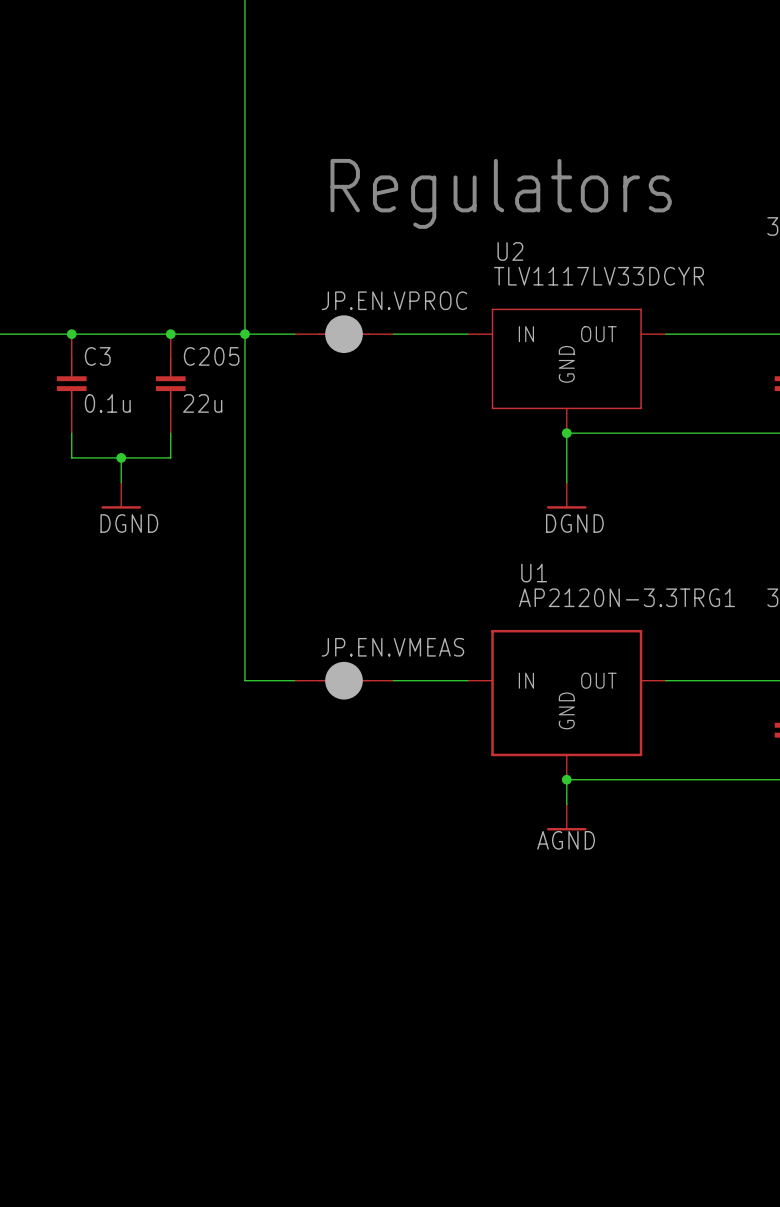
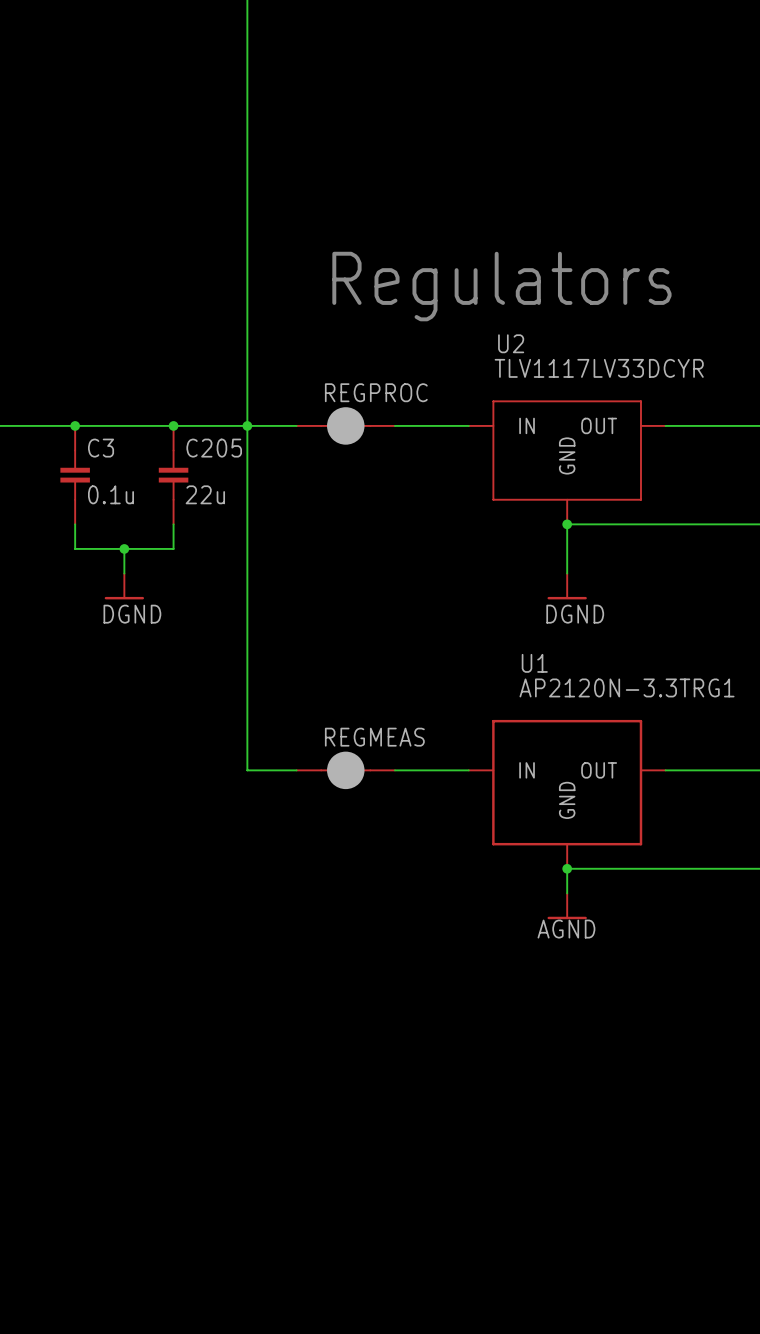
JP.EN.VPROC name: JP.EN.VPROC (394, 300) -> REGPROC (376, 392)
JP.EN.VMEAS name: JP.EN.VMEAS (392, 647) -> REGMEAS (374, 737)

